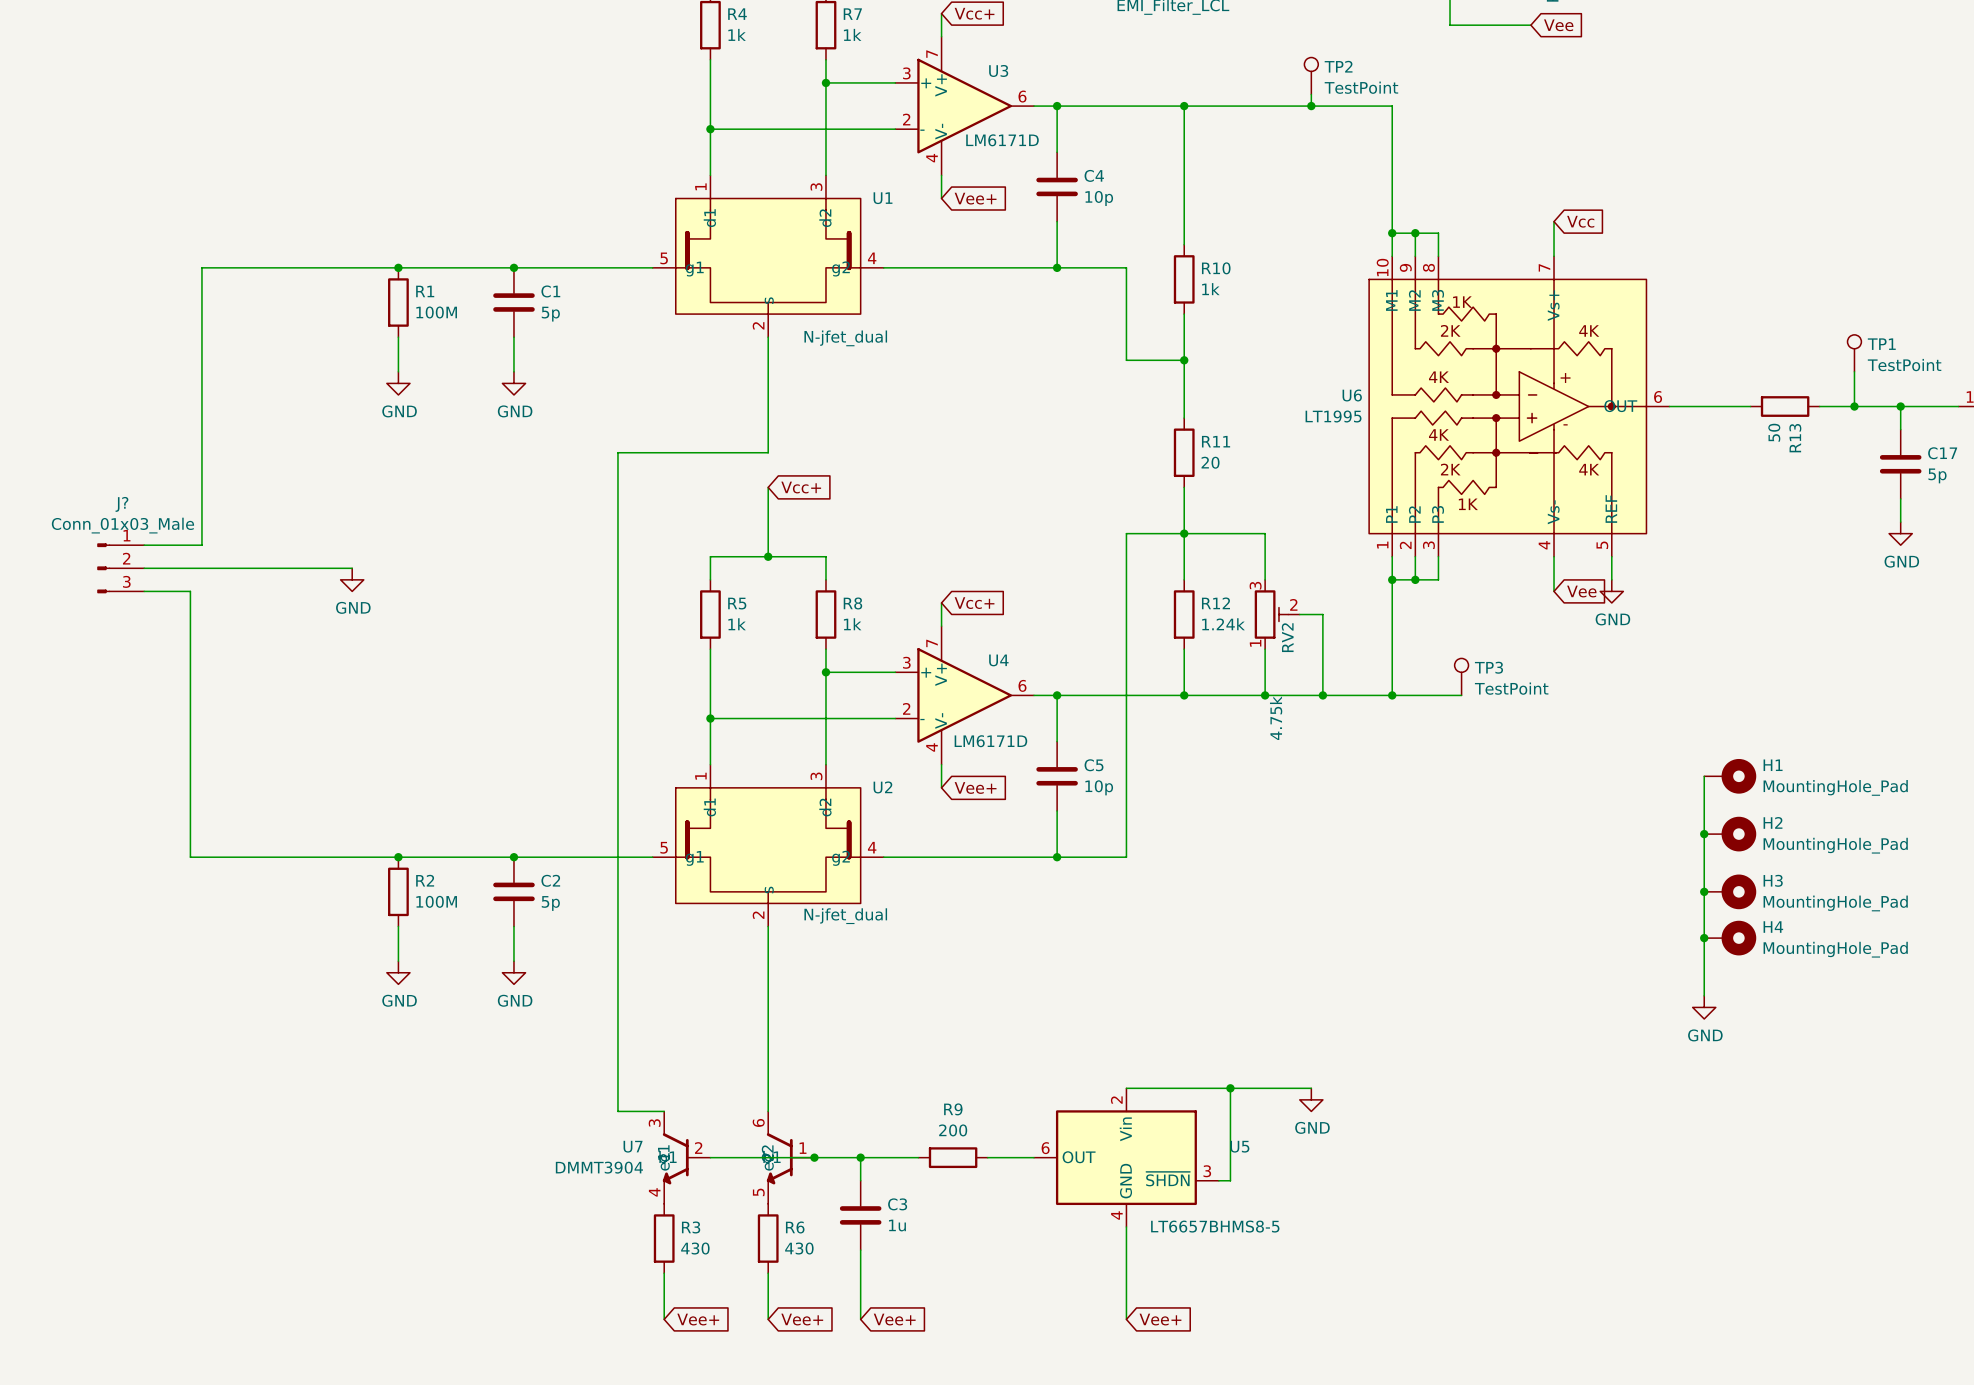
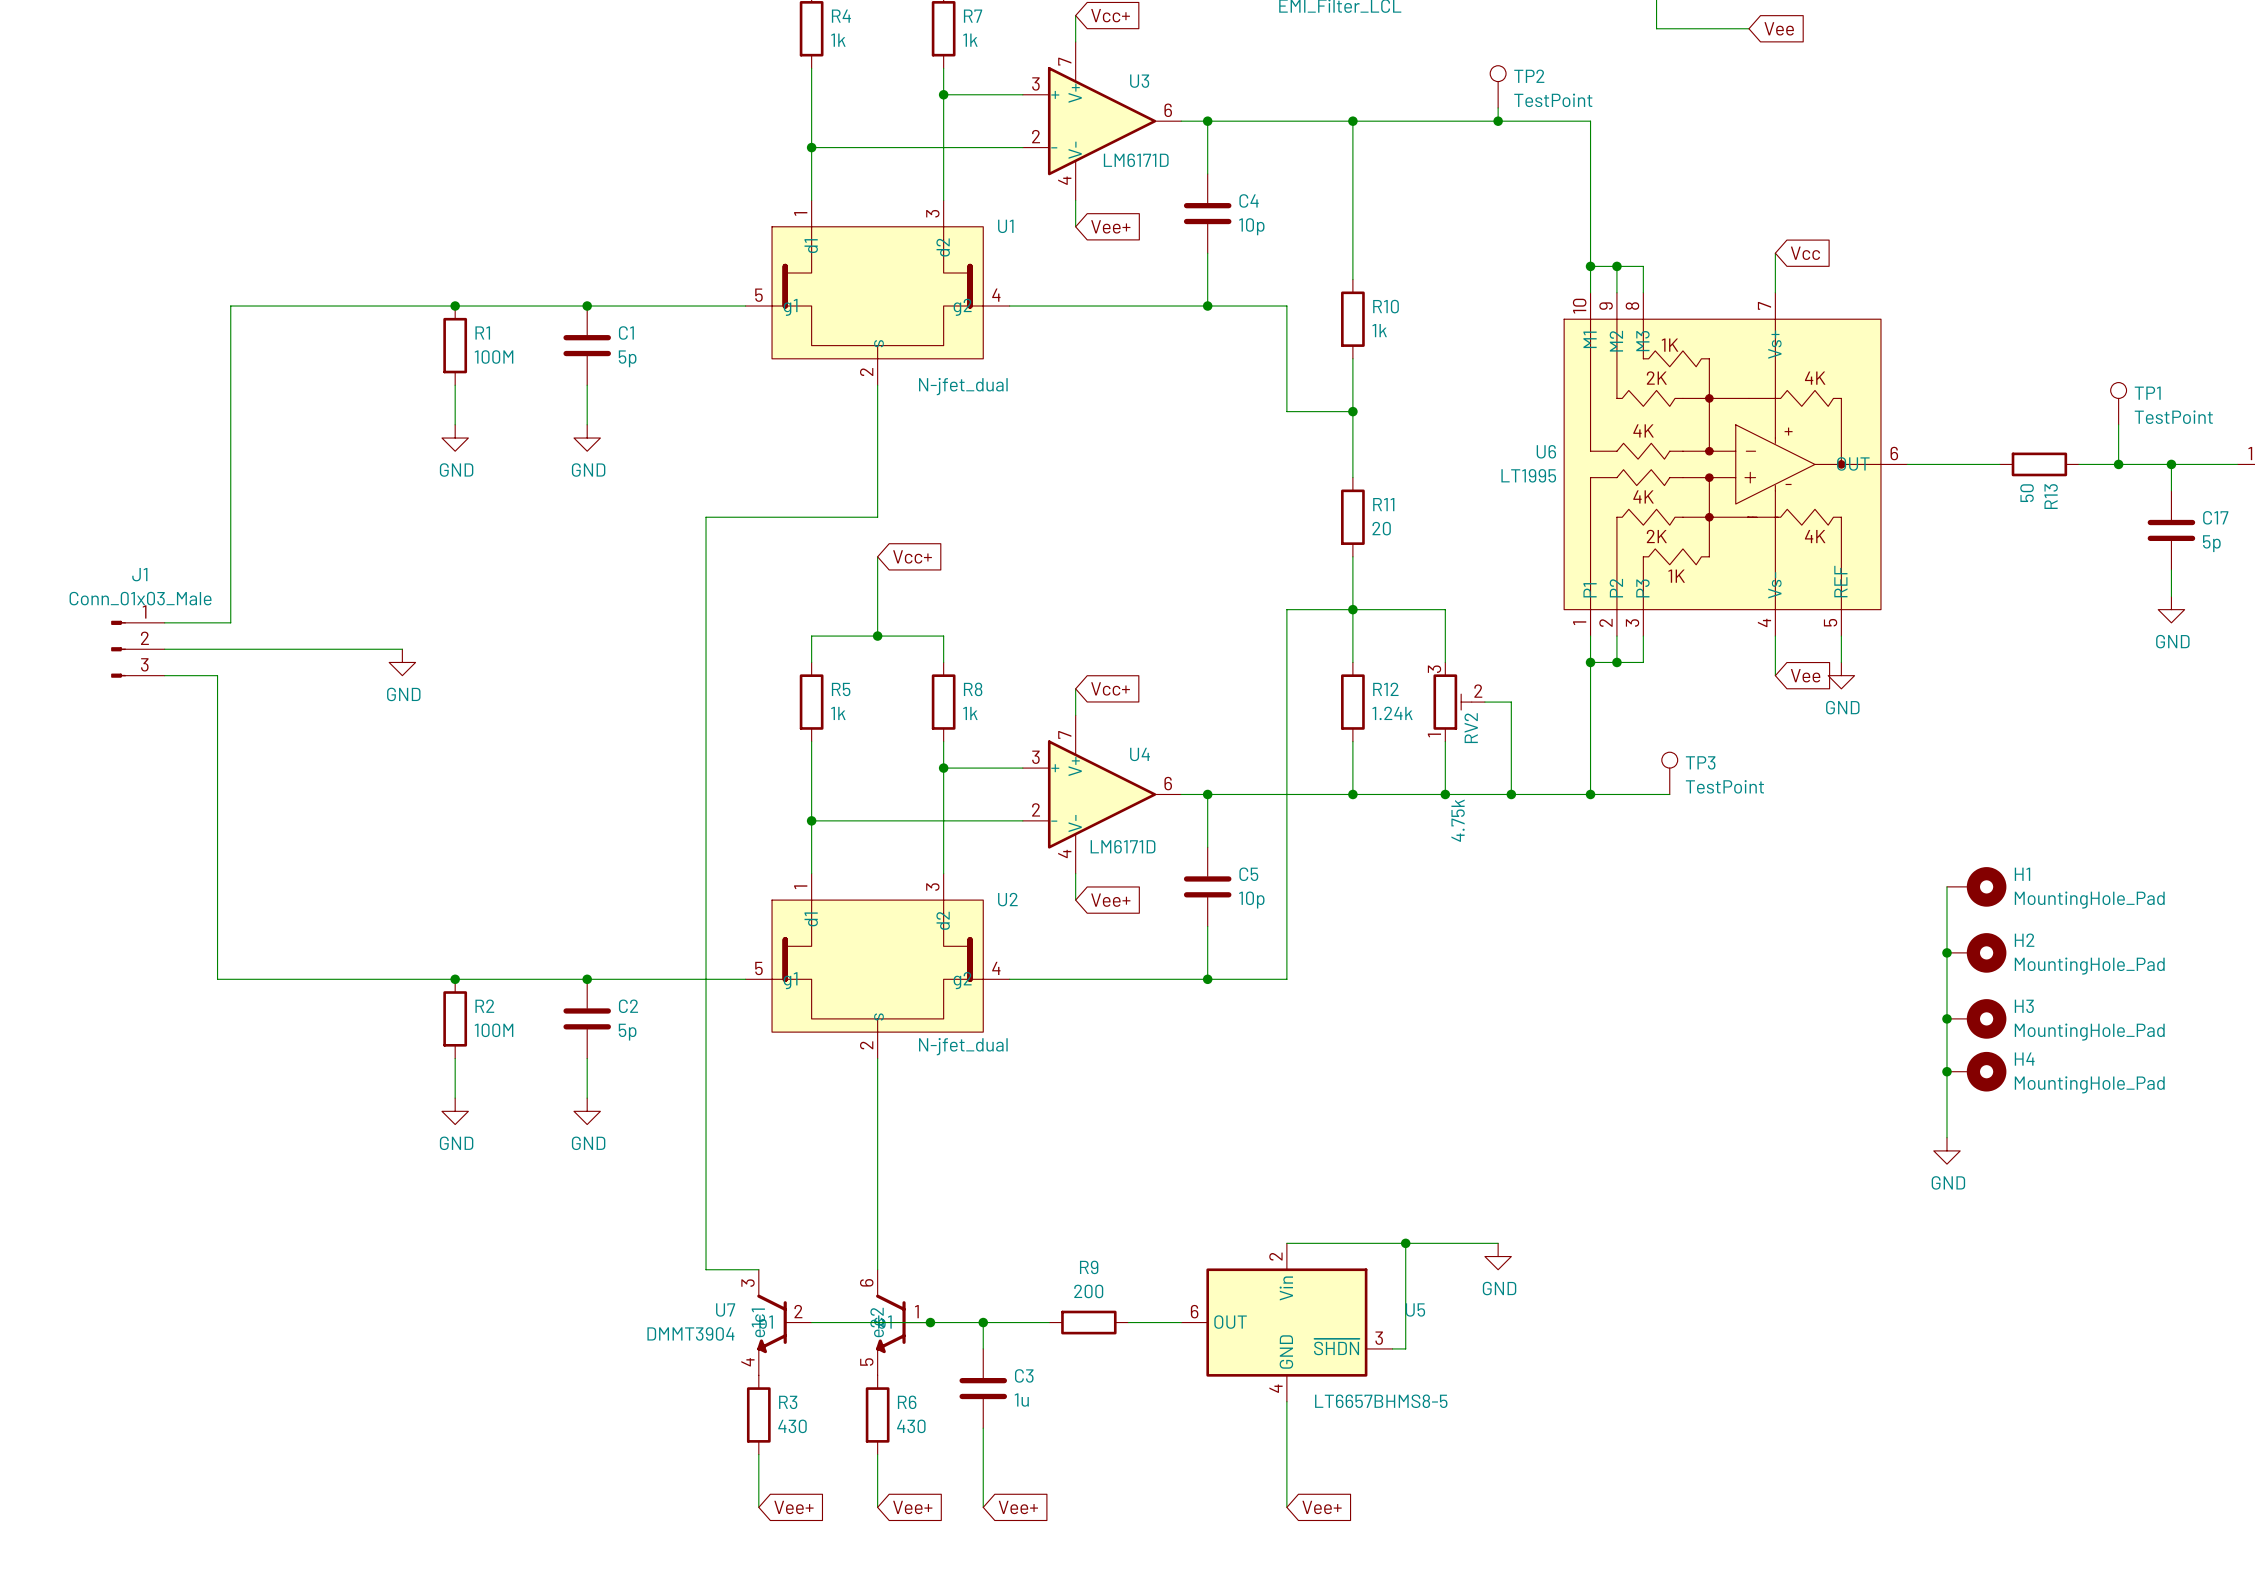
J? name: J? (121, 504) -> J1 (139, 574)

